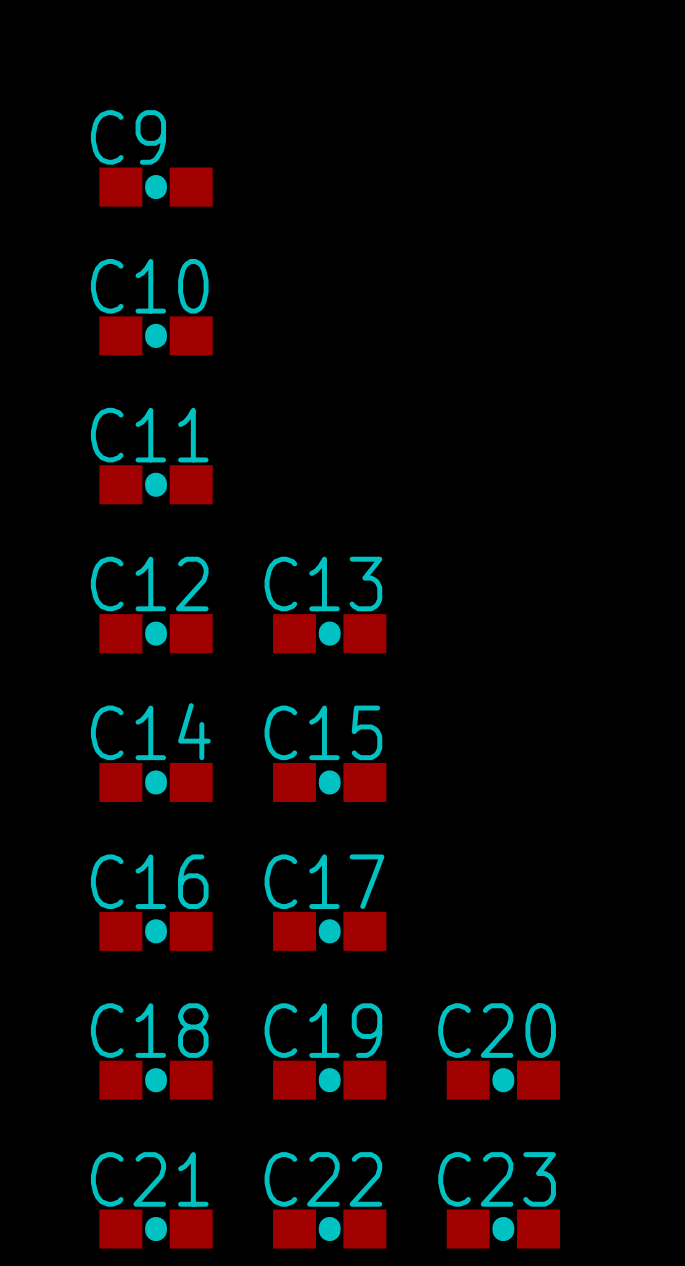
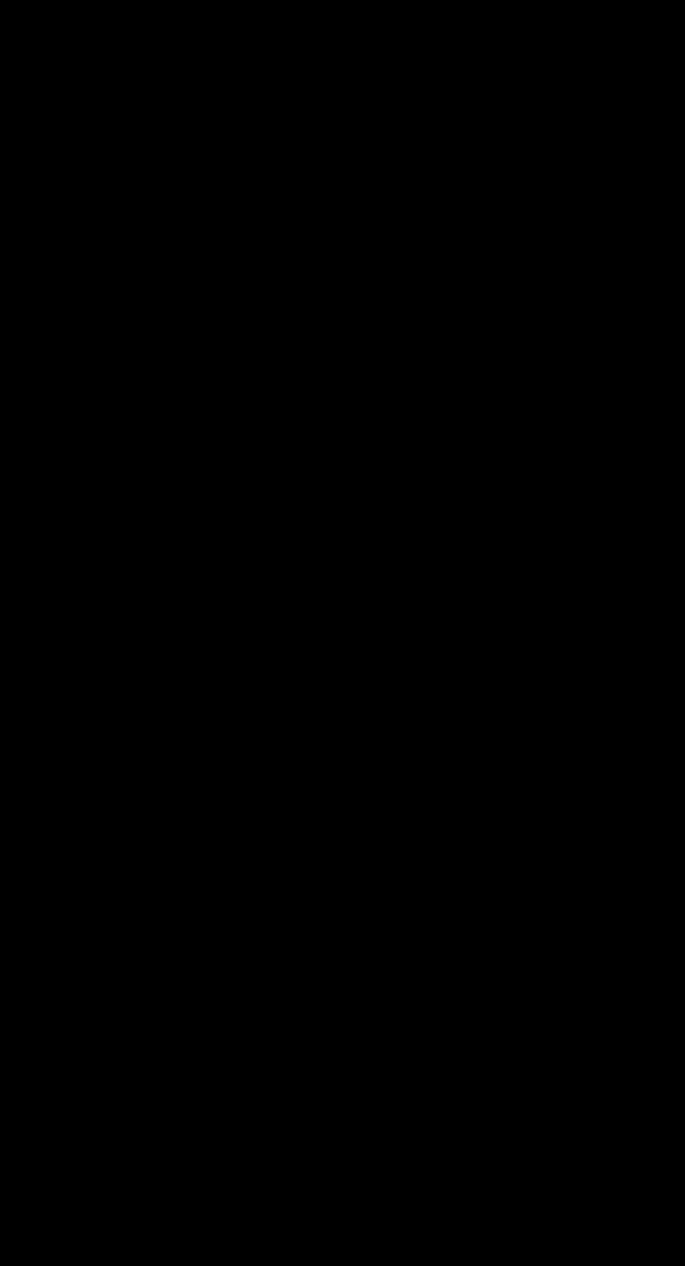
C9: (156, 187) -> none
C10: (156, 335) -> none
C11: (156, 484) -> none
C12: (156, 633) -> none
C13: (329, 633) -> none
C14: (156, 782) -> none
C15: (329, 782) -> none
C16: (156, 931) -> none
C17: (329, 931) -> none
C18: (156, 1080) -> none
C19: (329, 1080) -> none
C20: (503, 1080) -> none
C21: (156, 1229) -> none
C22: (329, 1229) -> none
C23: (503, 1229) -> none

